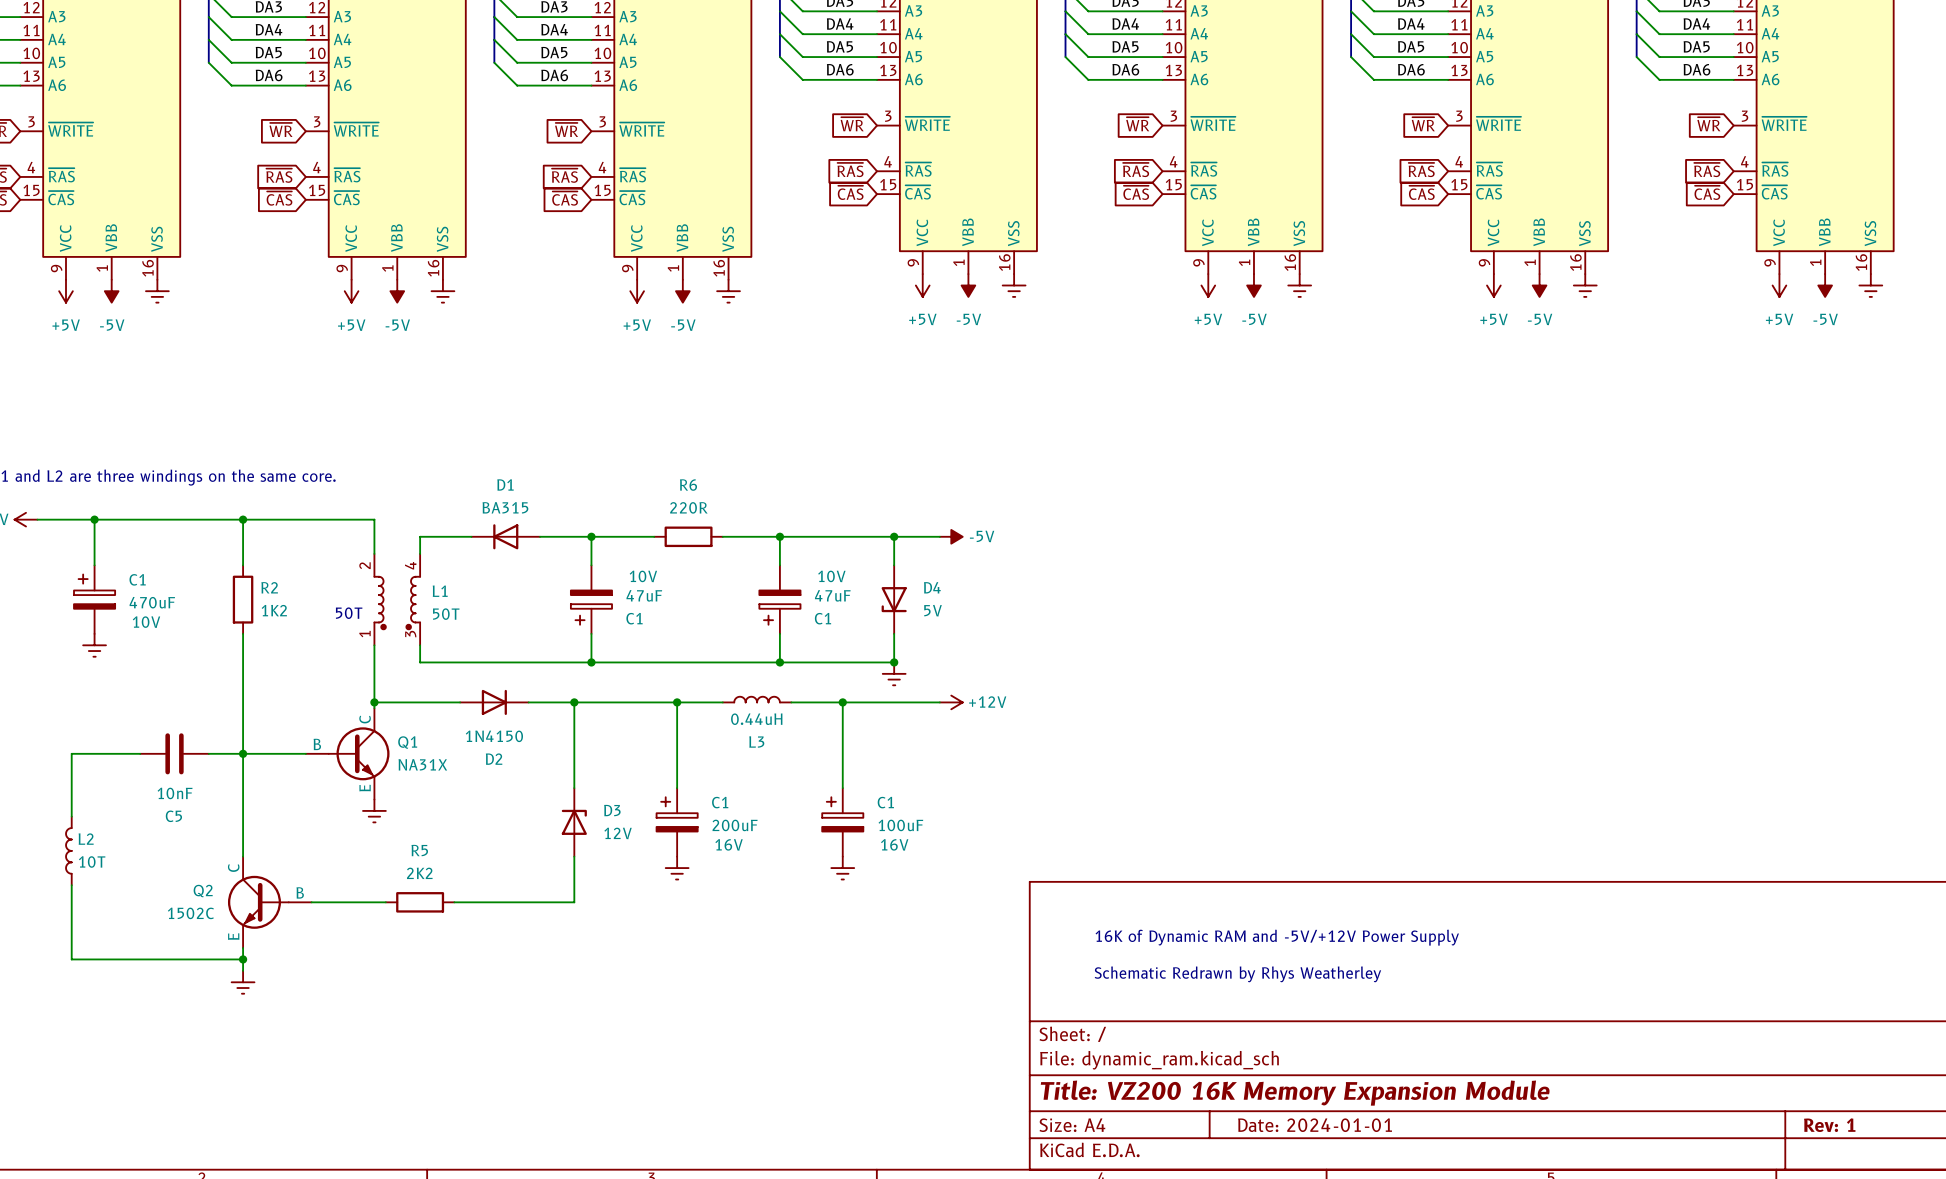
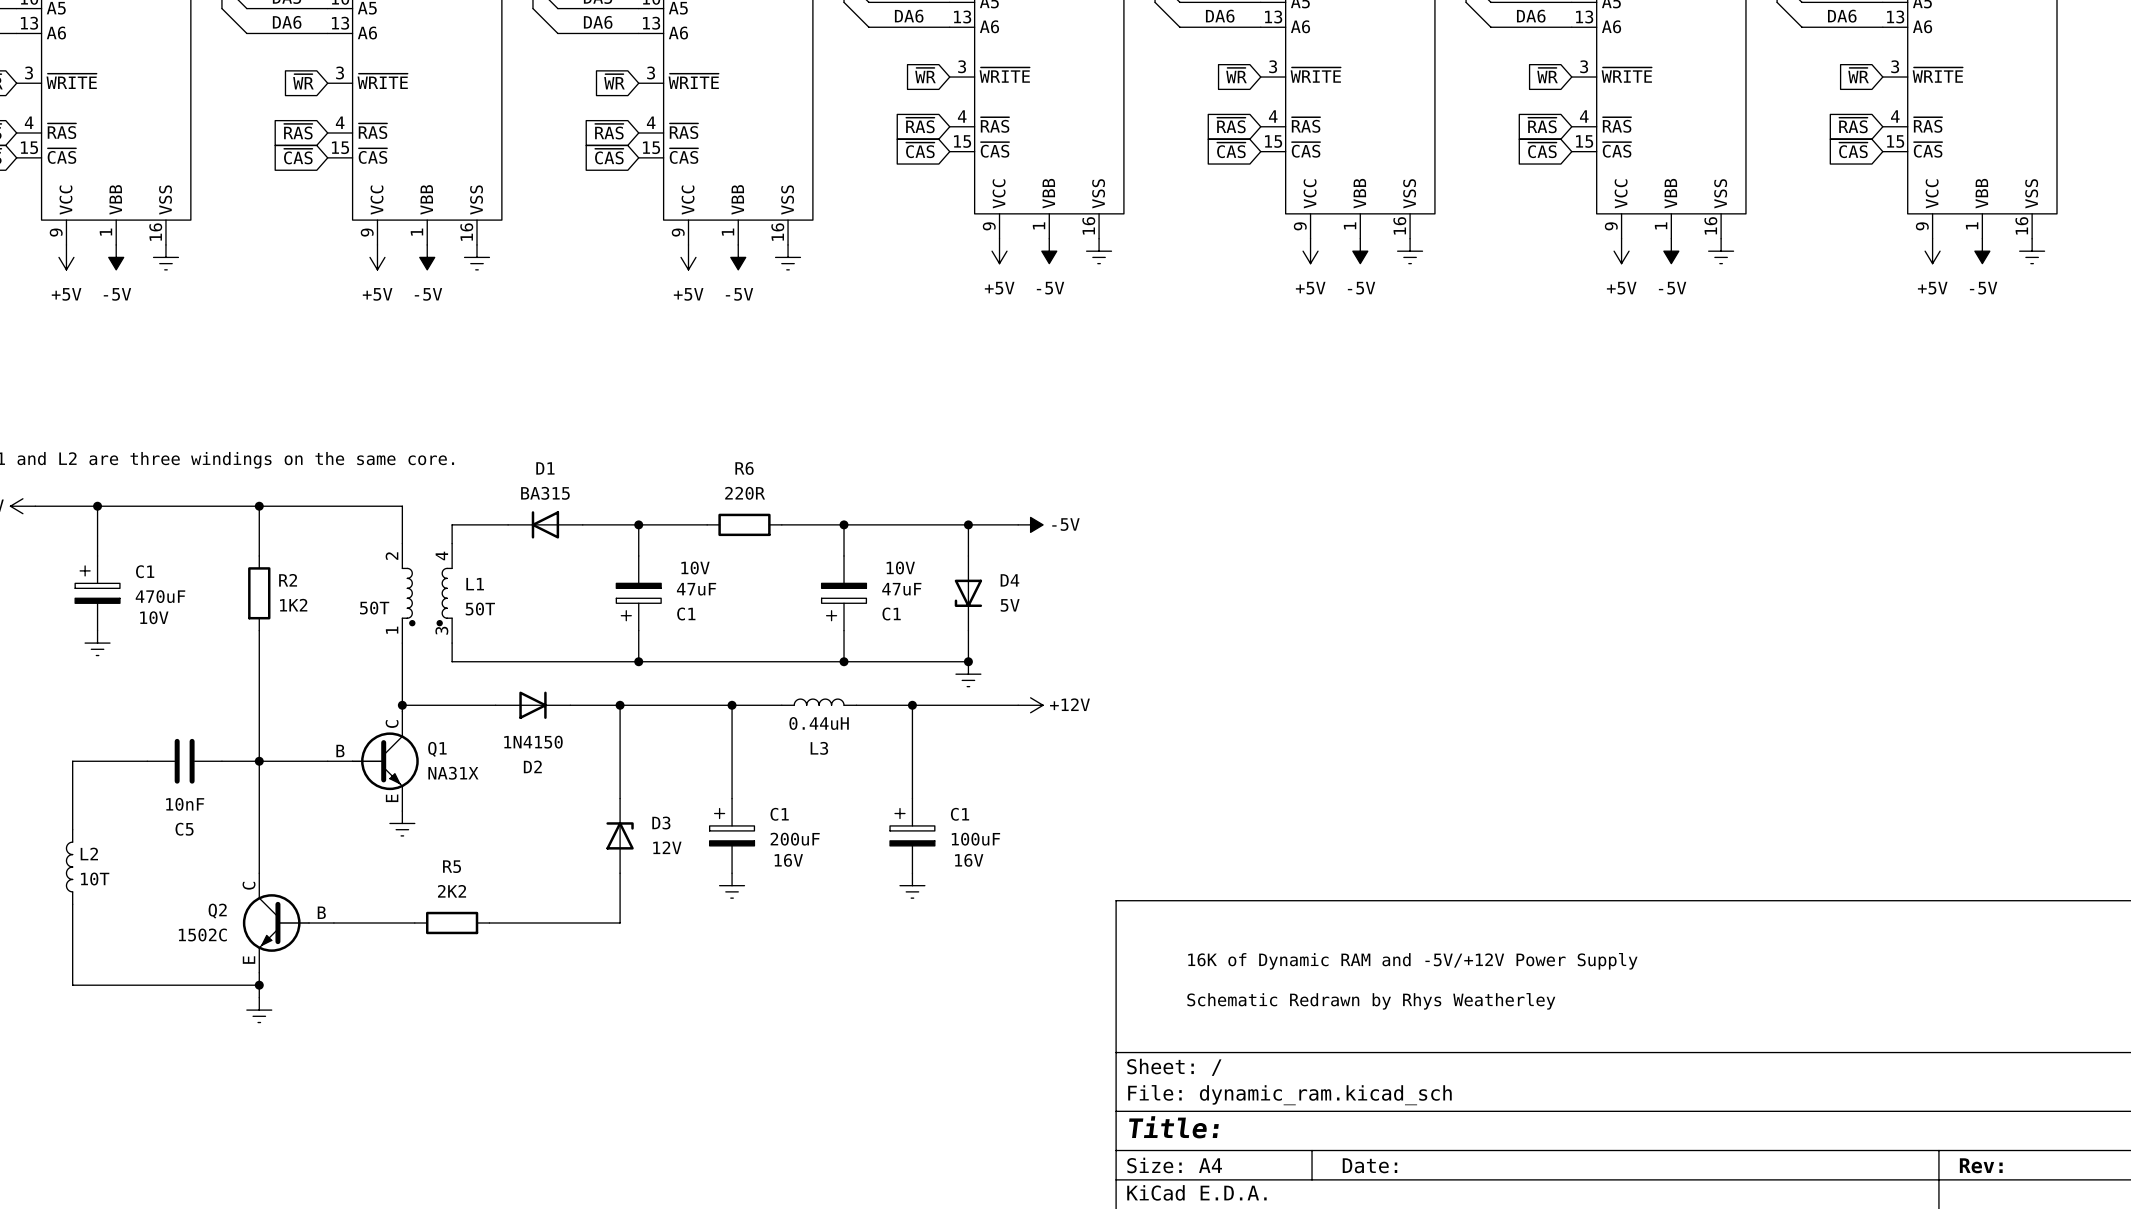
title block: Title: VZ200 16K Memory Expansion Module (1295, 1093) -> Title: (1173, 1127)
title block: Date: 2024-01-01 (1315, 1125) -> Date: (1369, 1165)
title block: Rev: 1 (1829, 1125) -> Rev: (1981, 1165)

